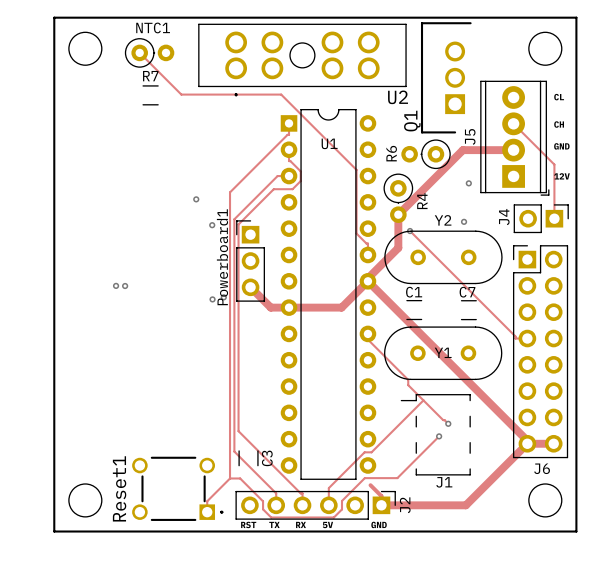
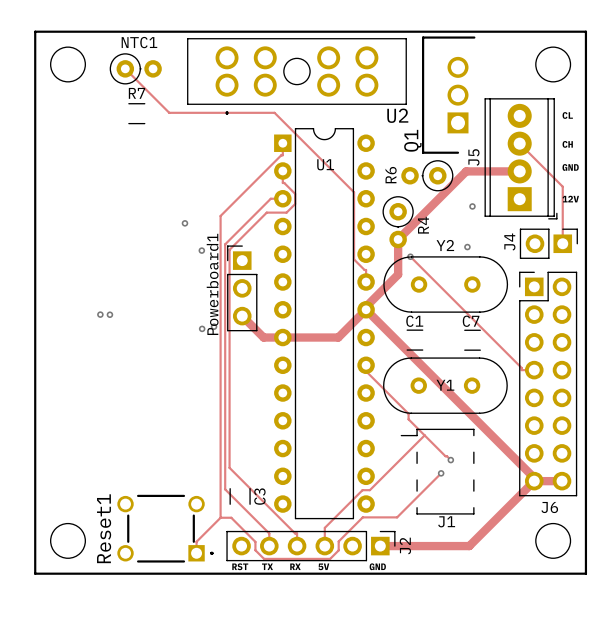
track: (370, 485) (381, 496) (381, 505) -> none

